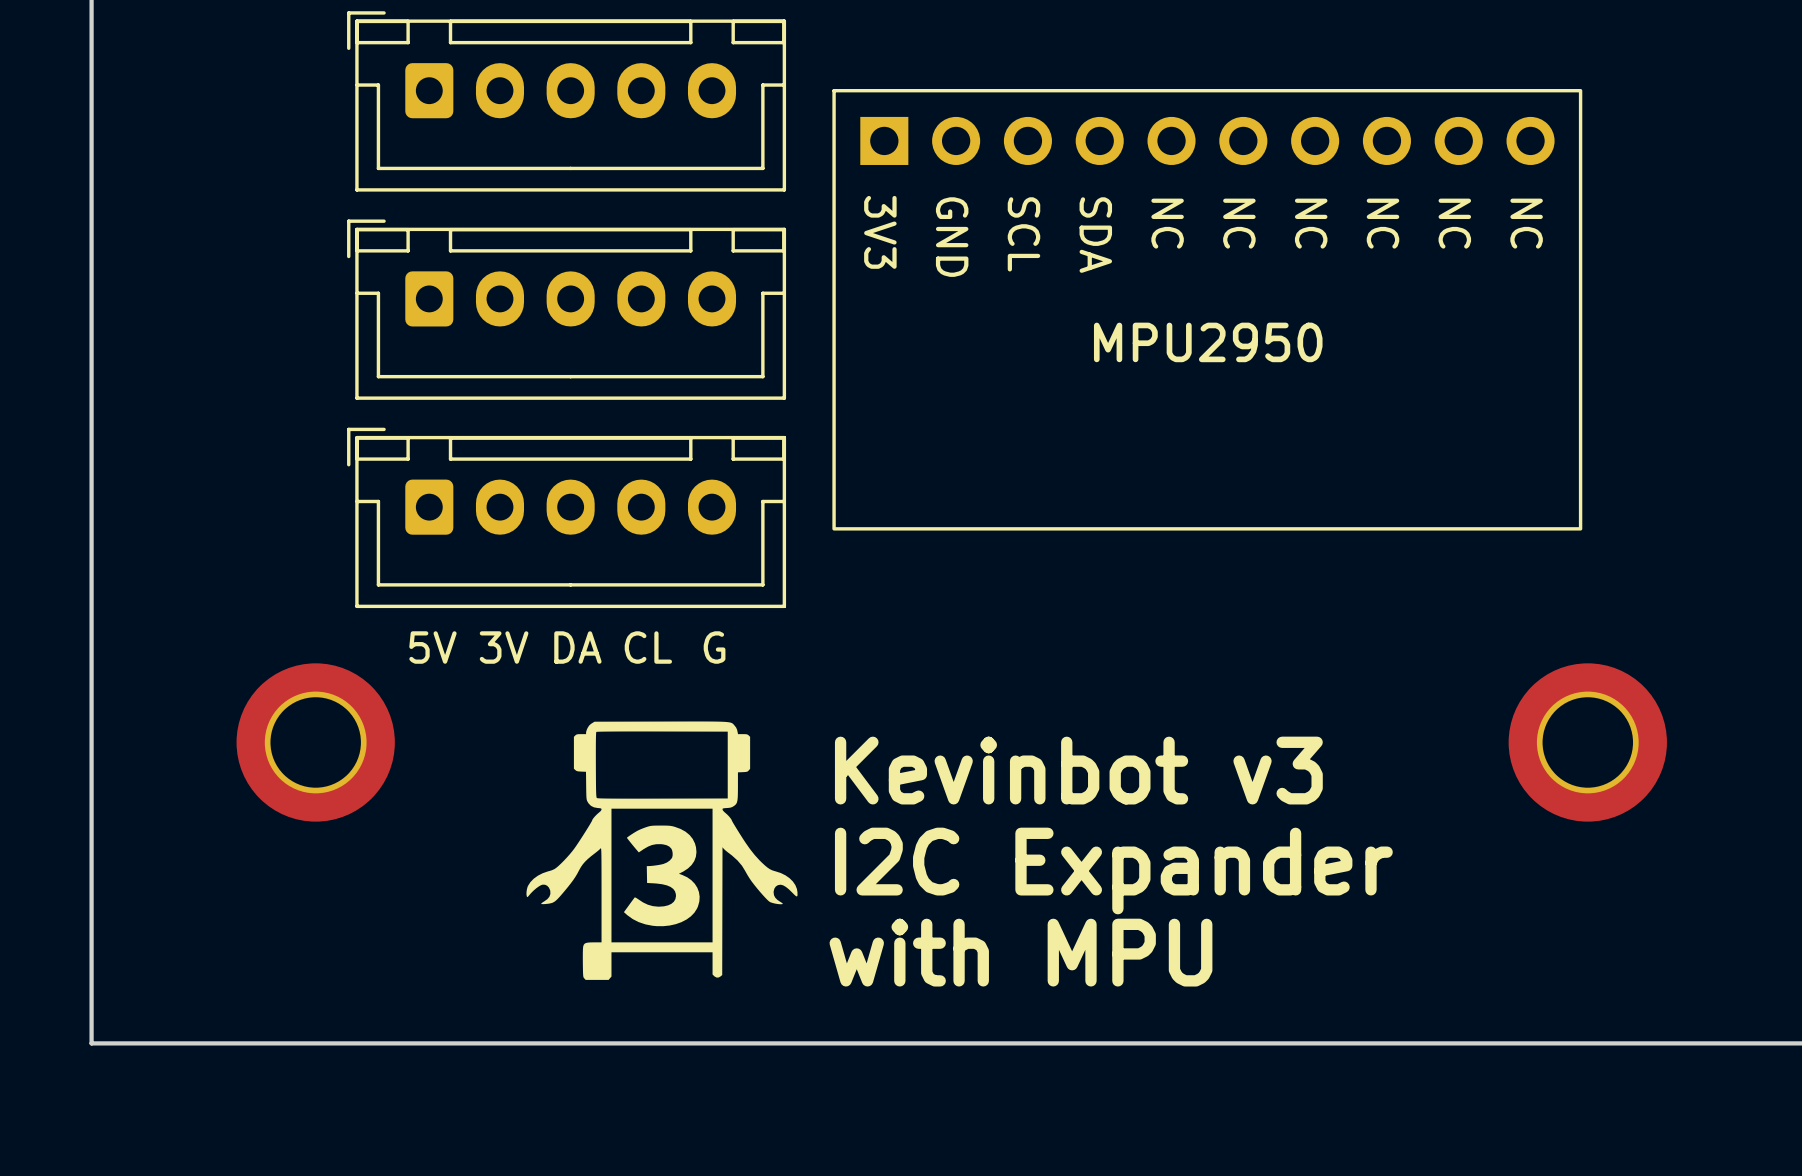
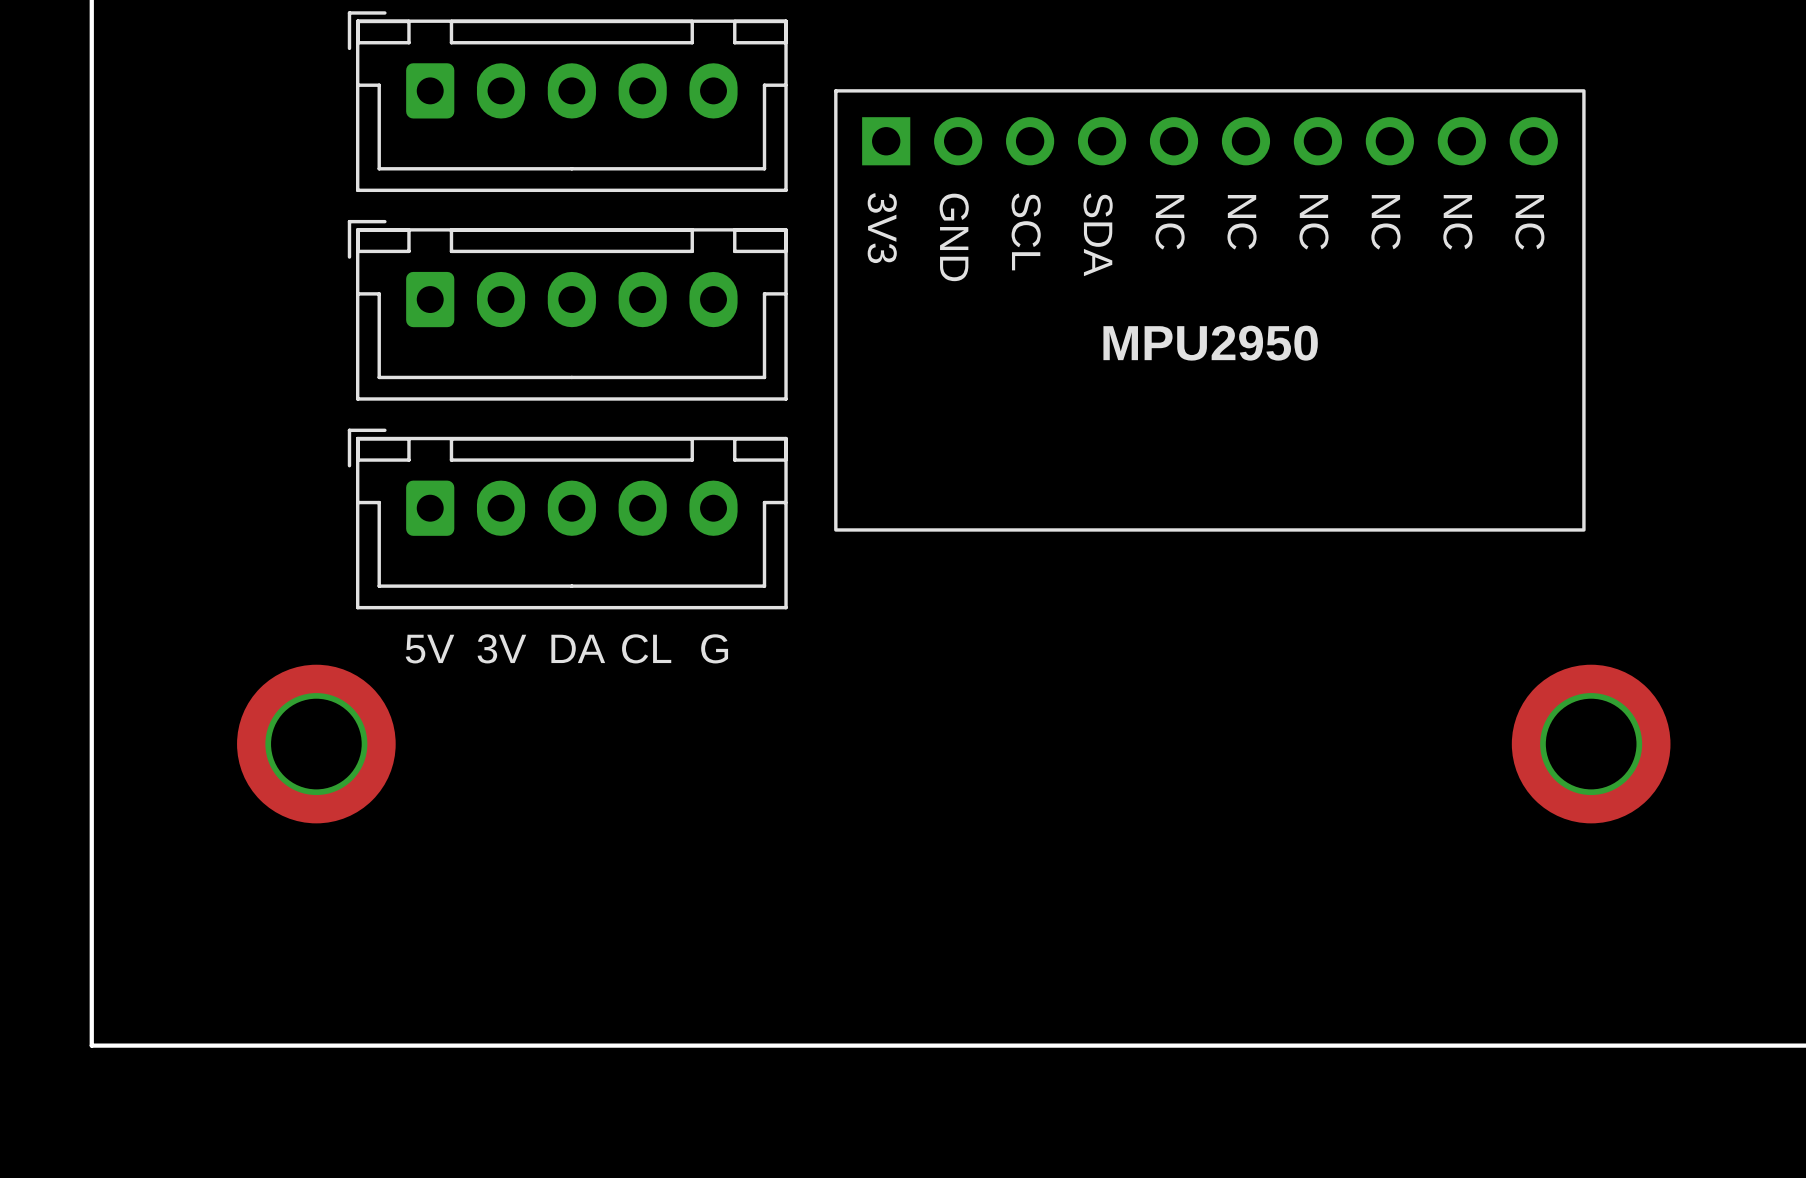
drawing: [526, 721, 798, 980] -> none
text: Kevinbot v3 (1078, 770) -> none
text: I2C Expander (1113, 871) -> none
text: with MPU (1020, 952) -> none

